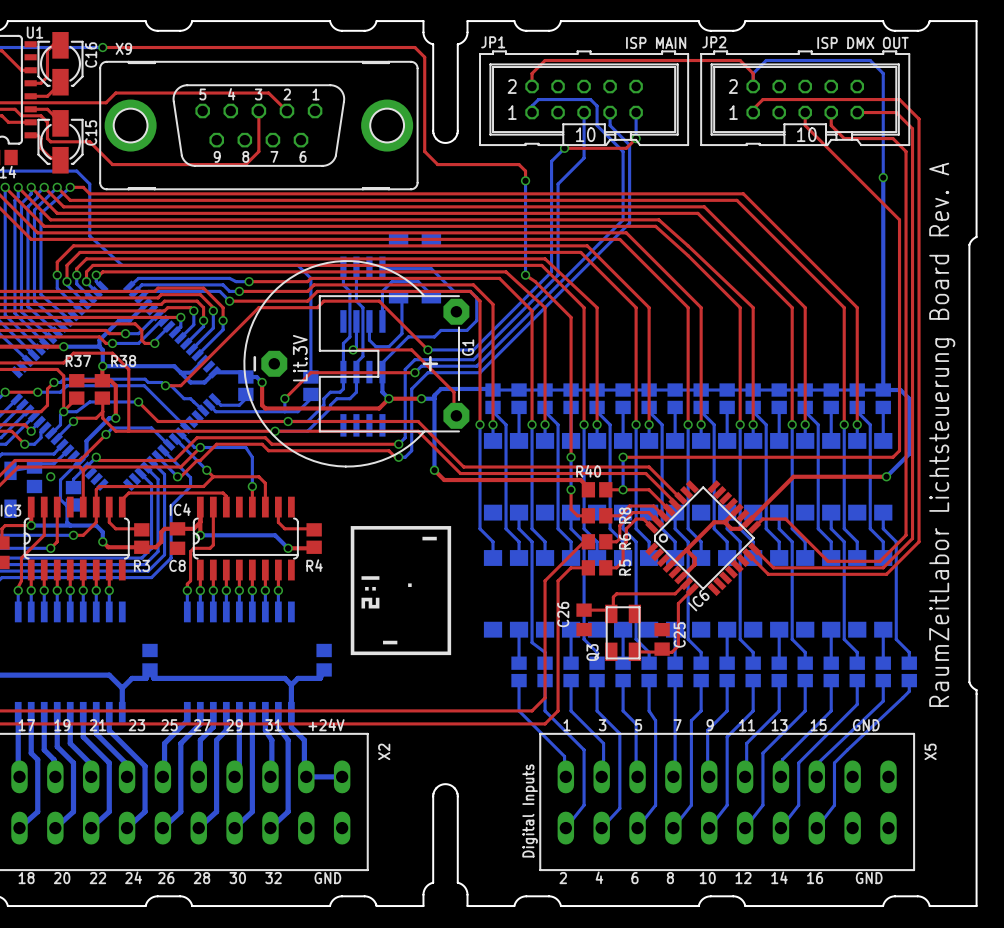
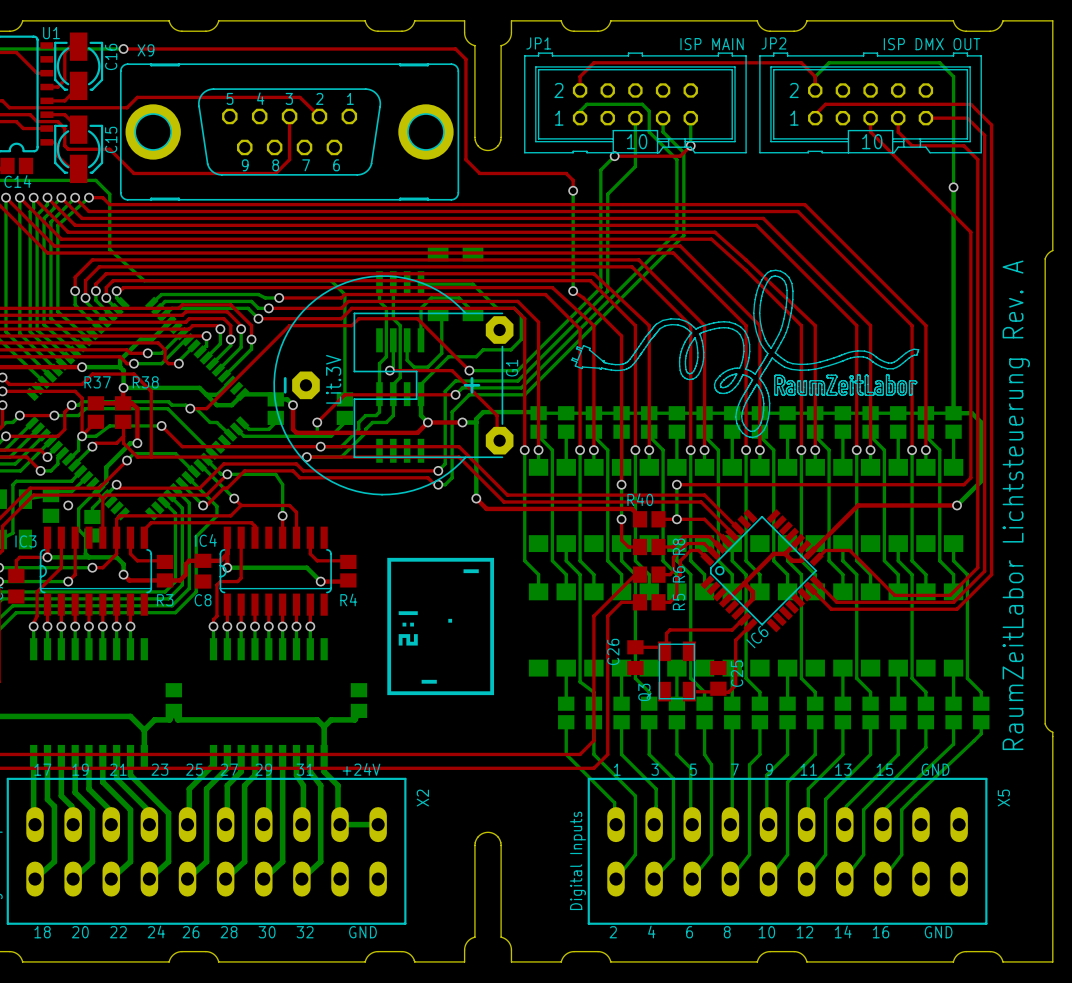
drawing: none -> [571, 270, 919, 438]
text: RaumZeitLabor Lichtsteuerung Board Rev. A (942, 434) -> RaumZeitLabor Lichtsteuerung Rev. A (1016, 505)

